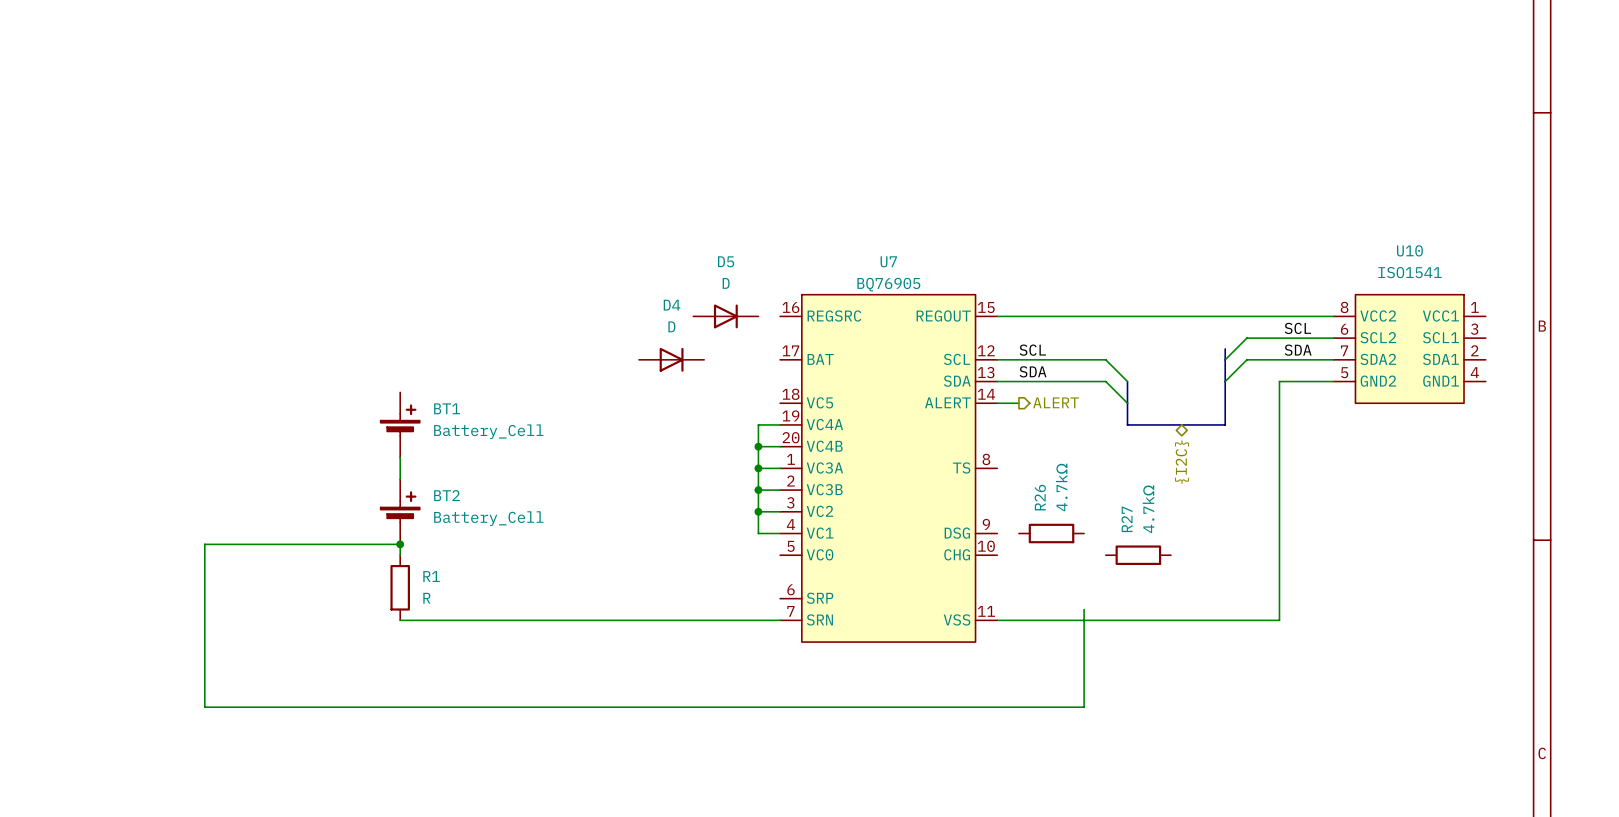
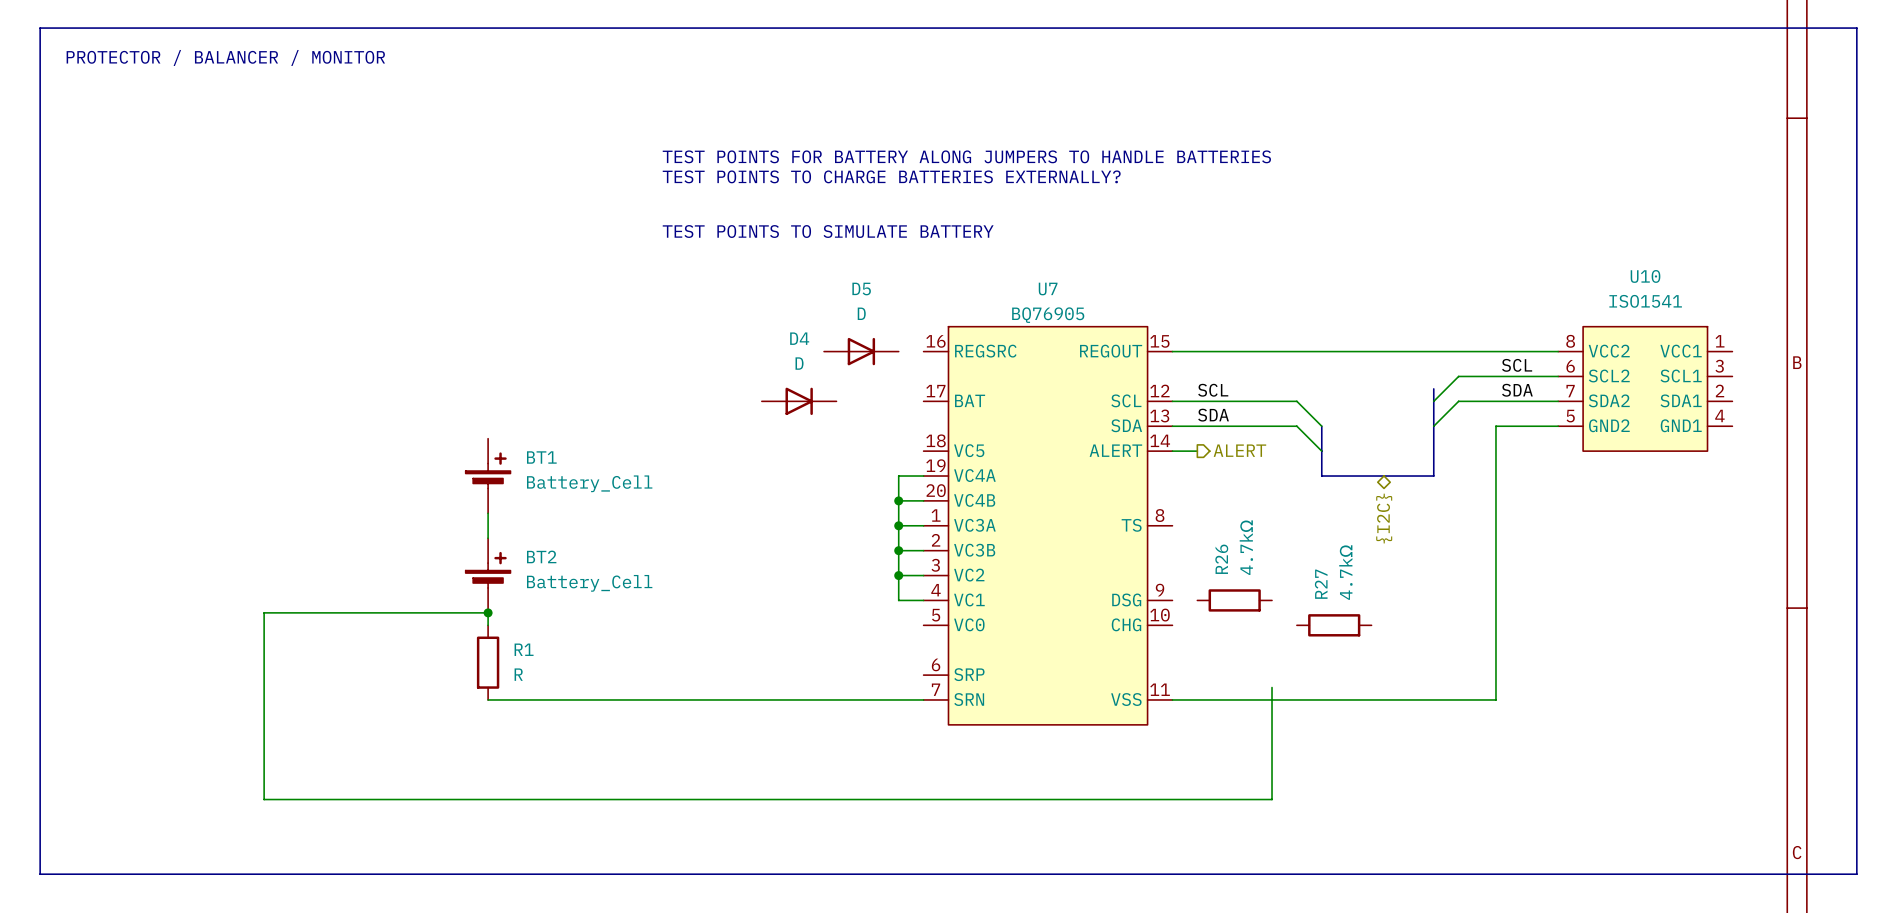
line: none -> (40, 28) (1856, 28) (1856, 874) (40, 874) (40, 28)
text: none -> PROTECTOR / BALANCER / MONITOR (225, 57)
text: none -> TEST POINTS FOR BATTERY ALONG JUMPERS TO HANDLE BATTERIES (966, 156)
text: none -> TEST POINTS TO CHARGE BATTERIES EXTERNALLY? (891, 176)
text: none -> TEST POINTS TO SIMULATE BATTERY (828, 231)

